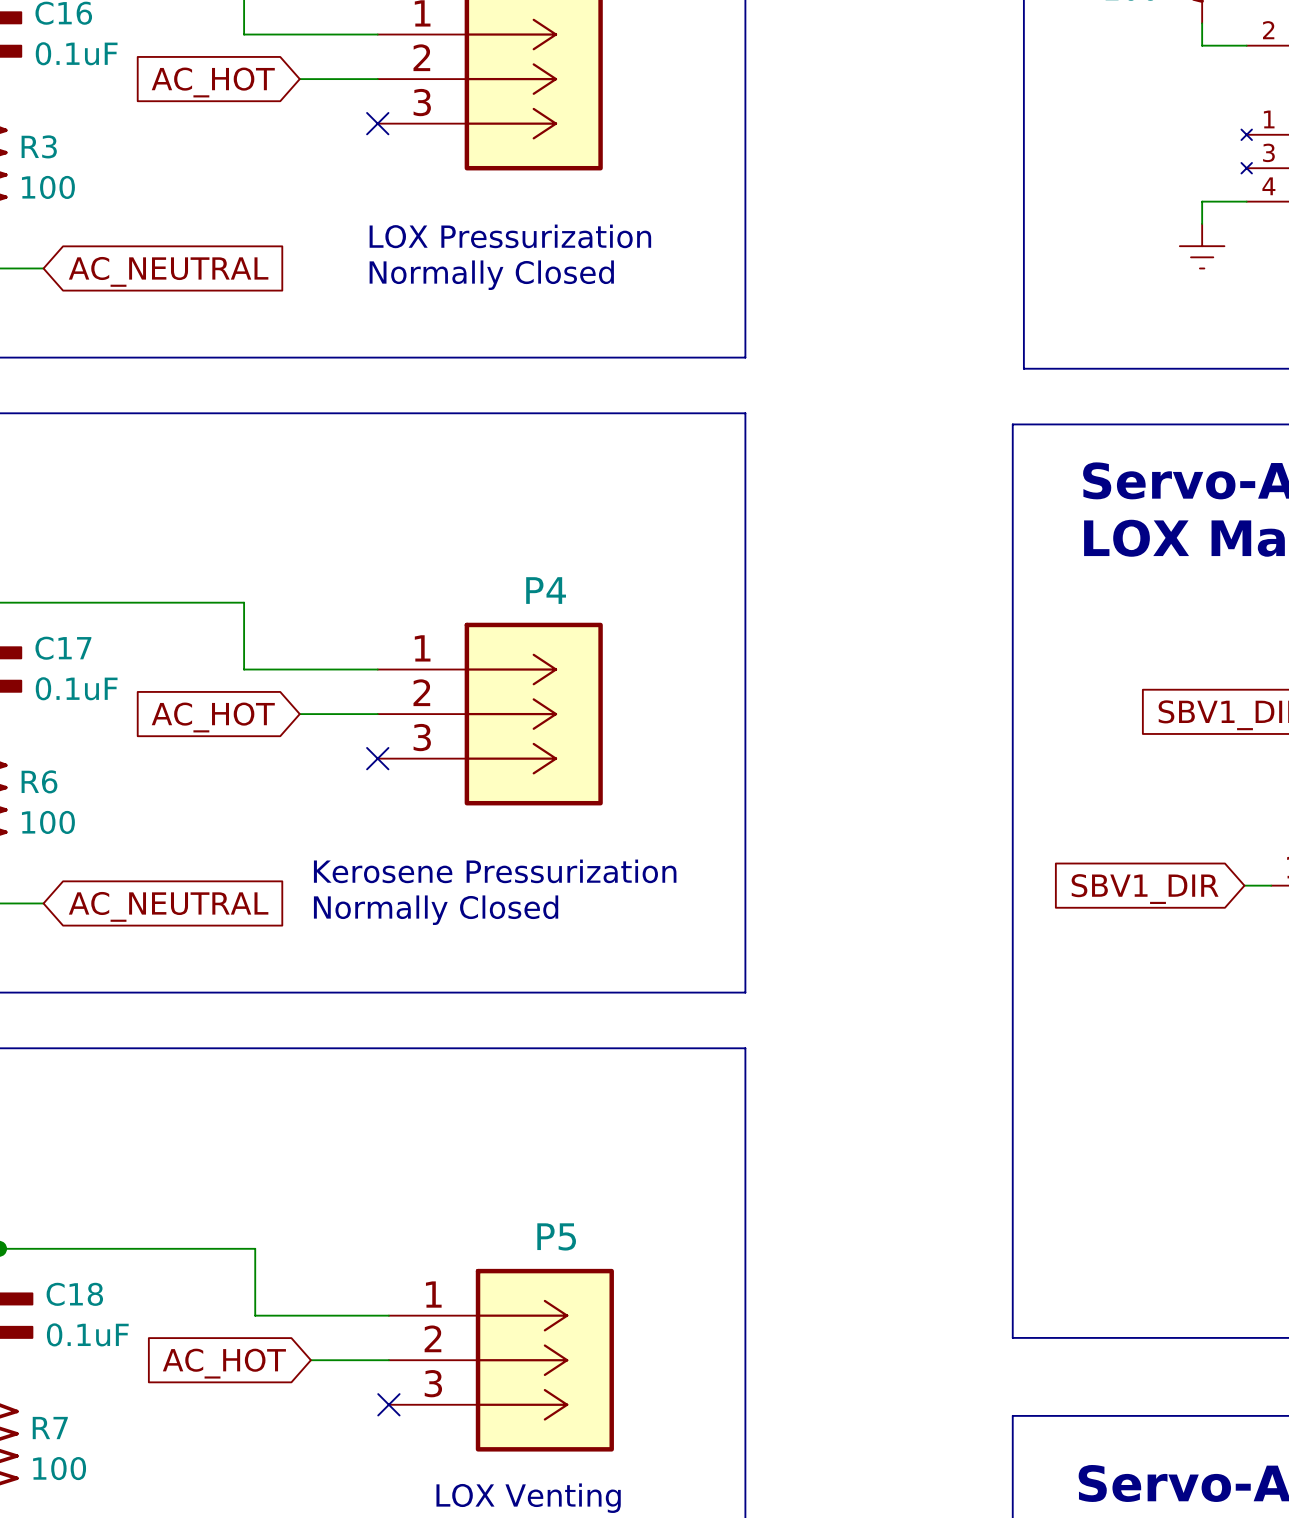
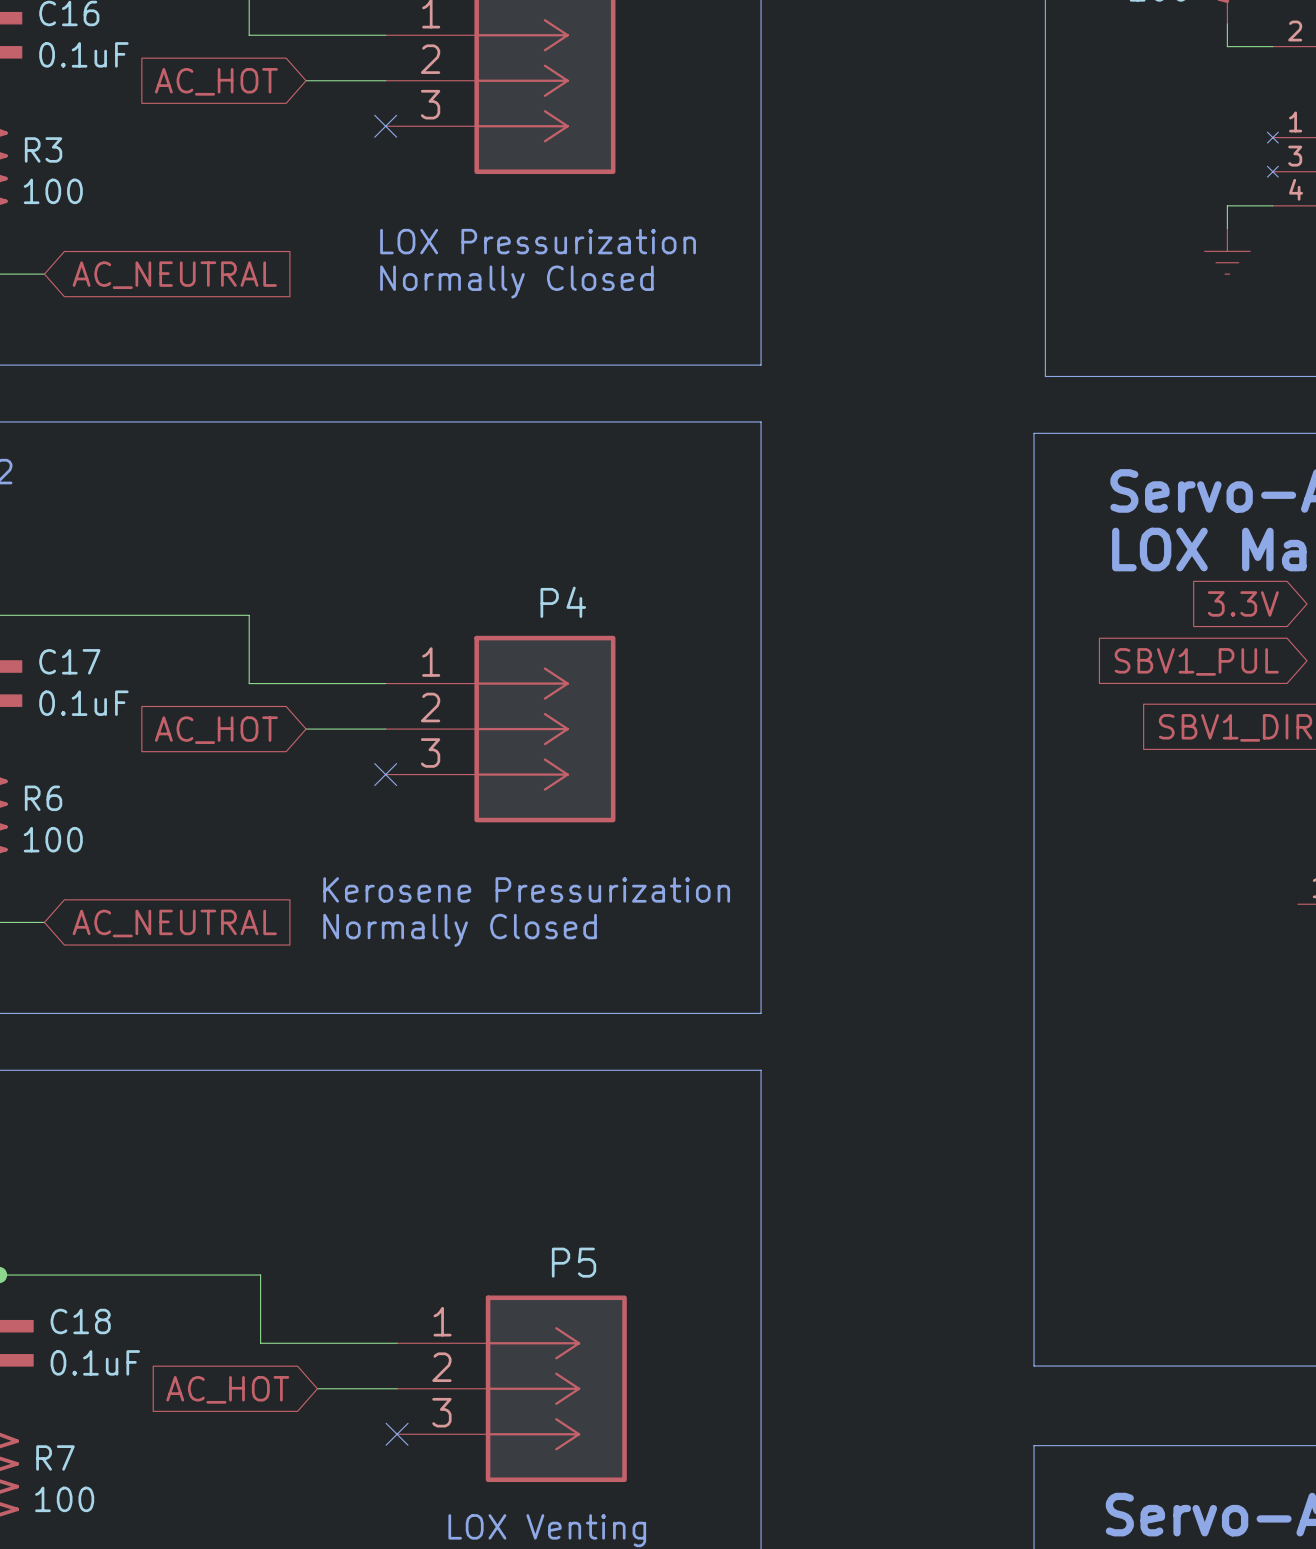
global label: none -> 3.3V (1243, 603)
global label: none -> SBV1_PUL (1196, 661)
wire: (1244, 885) (1271, 885) -> none
global label: SBV1_DIR (1145, 889) -> none

